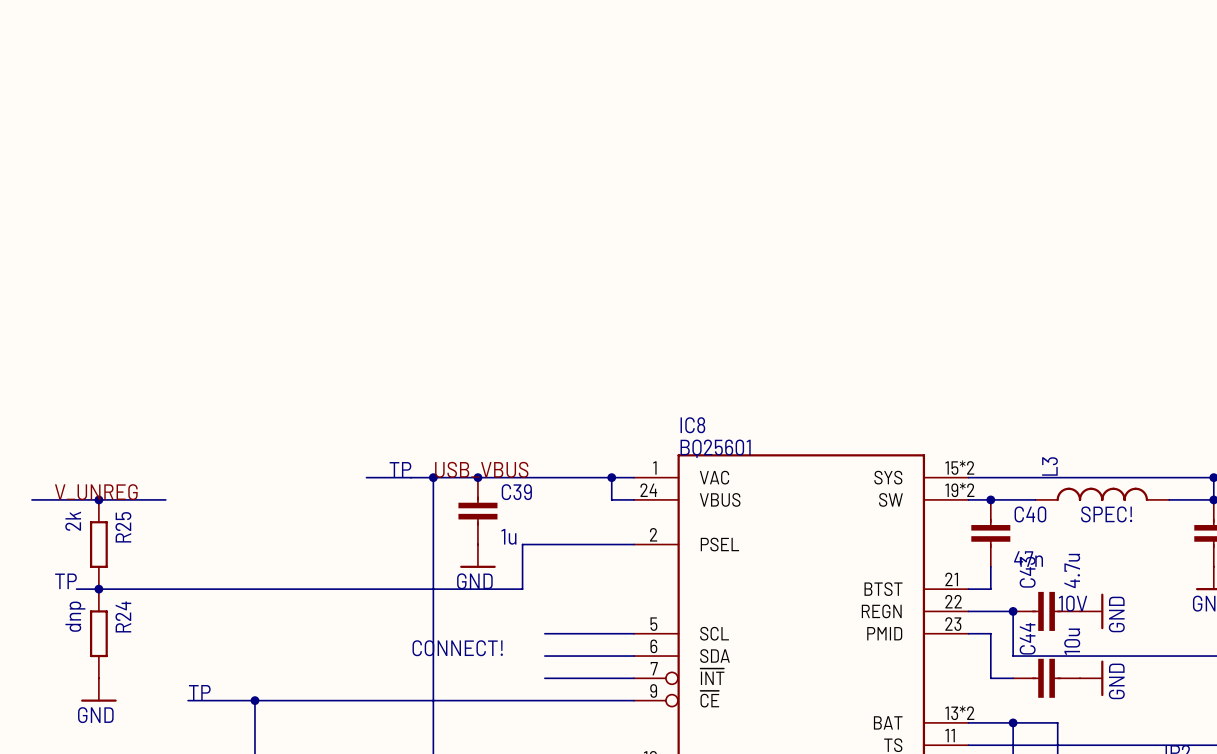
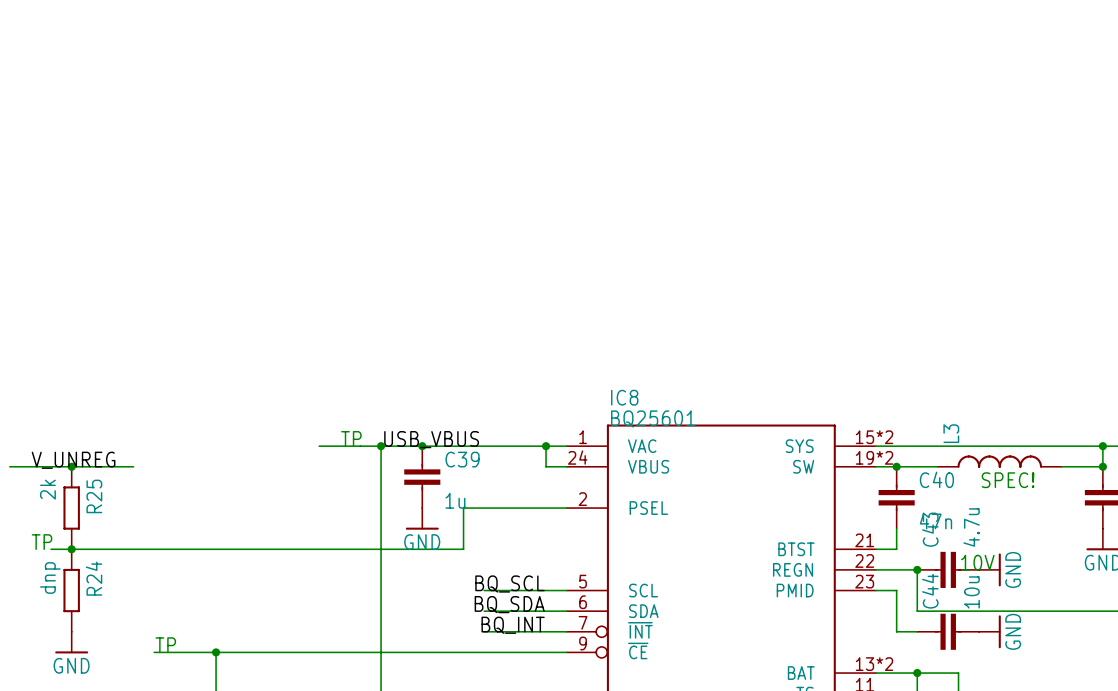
label: none -> BQ_SCL (510, 584)
text: CONNECT! (457, 648) -> none
label: none -> BQ_SDA (509, 604)
label: none -> BQ_INT (513, 625)

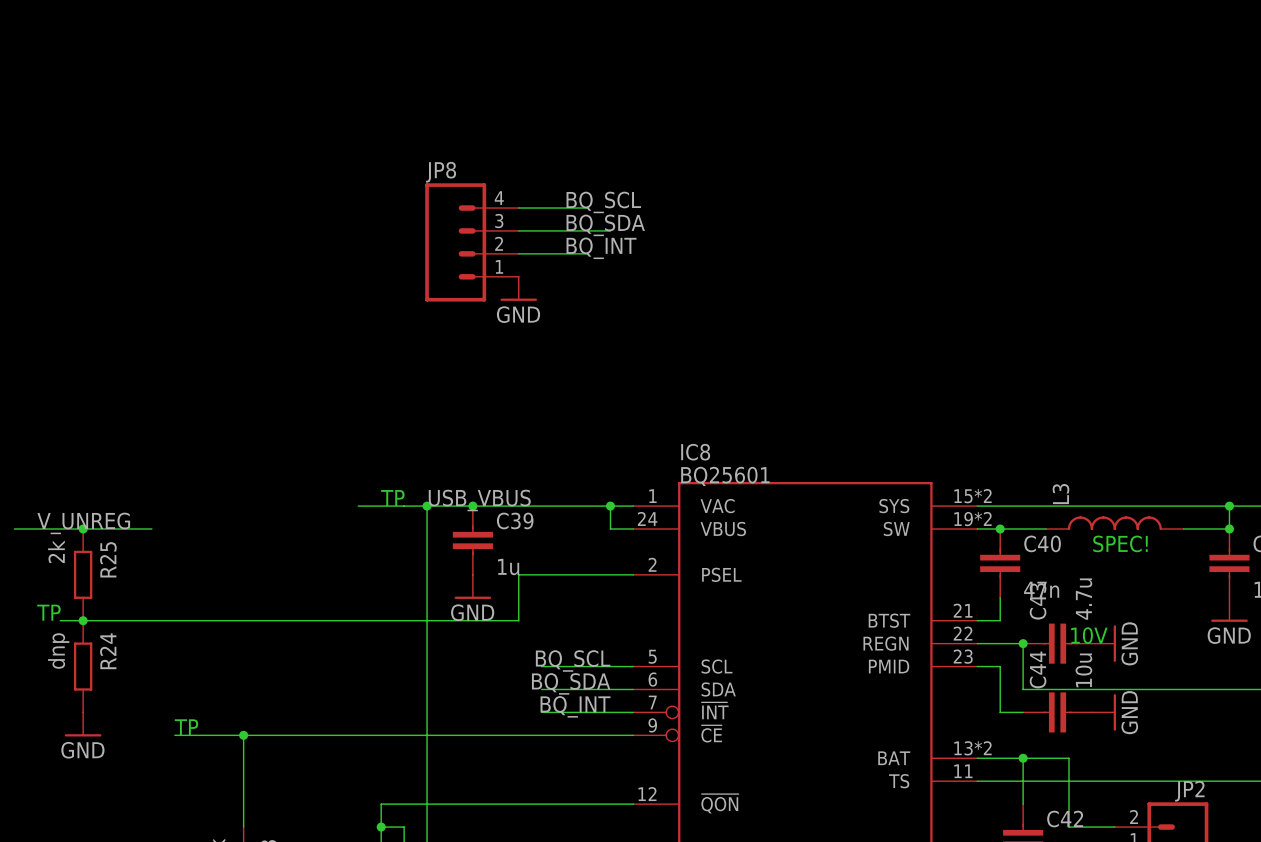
label: none -> BQ_SCL (603, 202)
wire: none -> (518, 208) (587, 208)
label: none -> BQ_SDA (605, 225)
wire: none -> (518, 230) (610, 230)
JP8: none -> (471, 242)
label: none -> BQ_INT (601, 248)
wire: none -> (518, 253) (587, 253)
power symbol: none -> GND (518, 288)

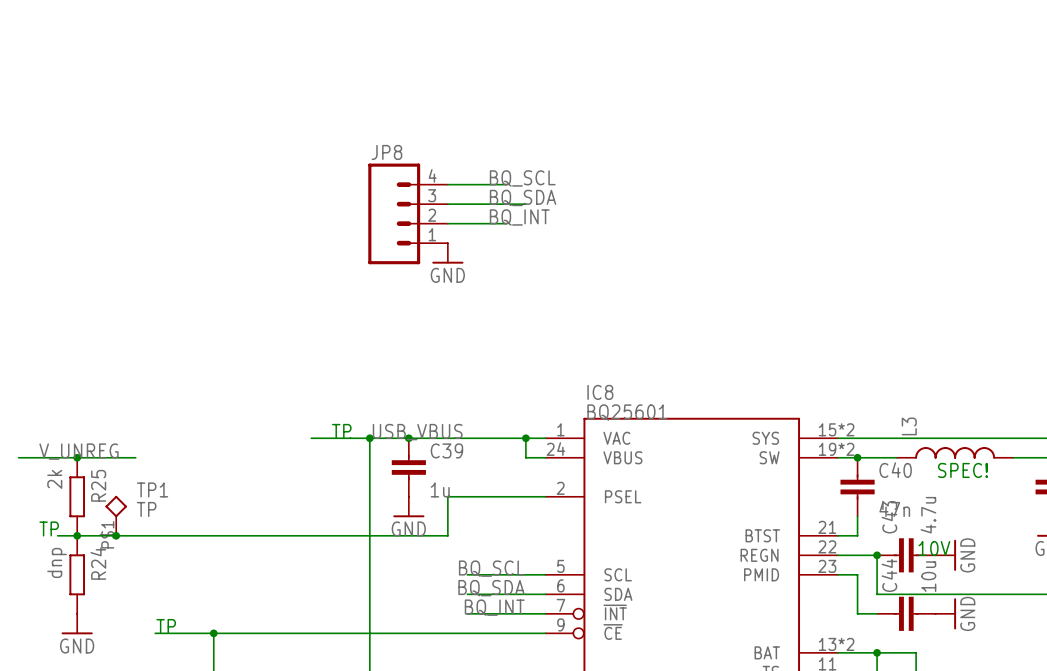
TP1: none -> TP (116, 515)
junction: none -> (116, 535)

